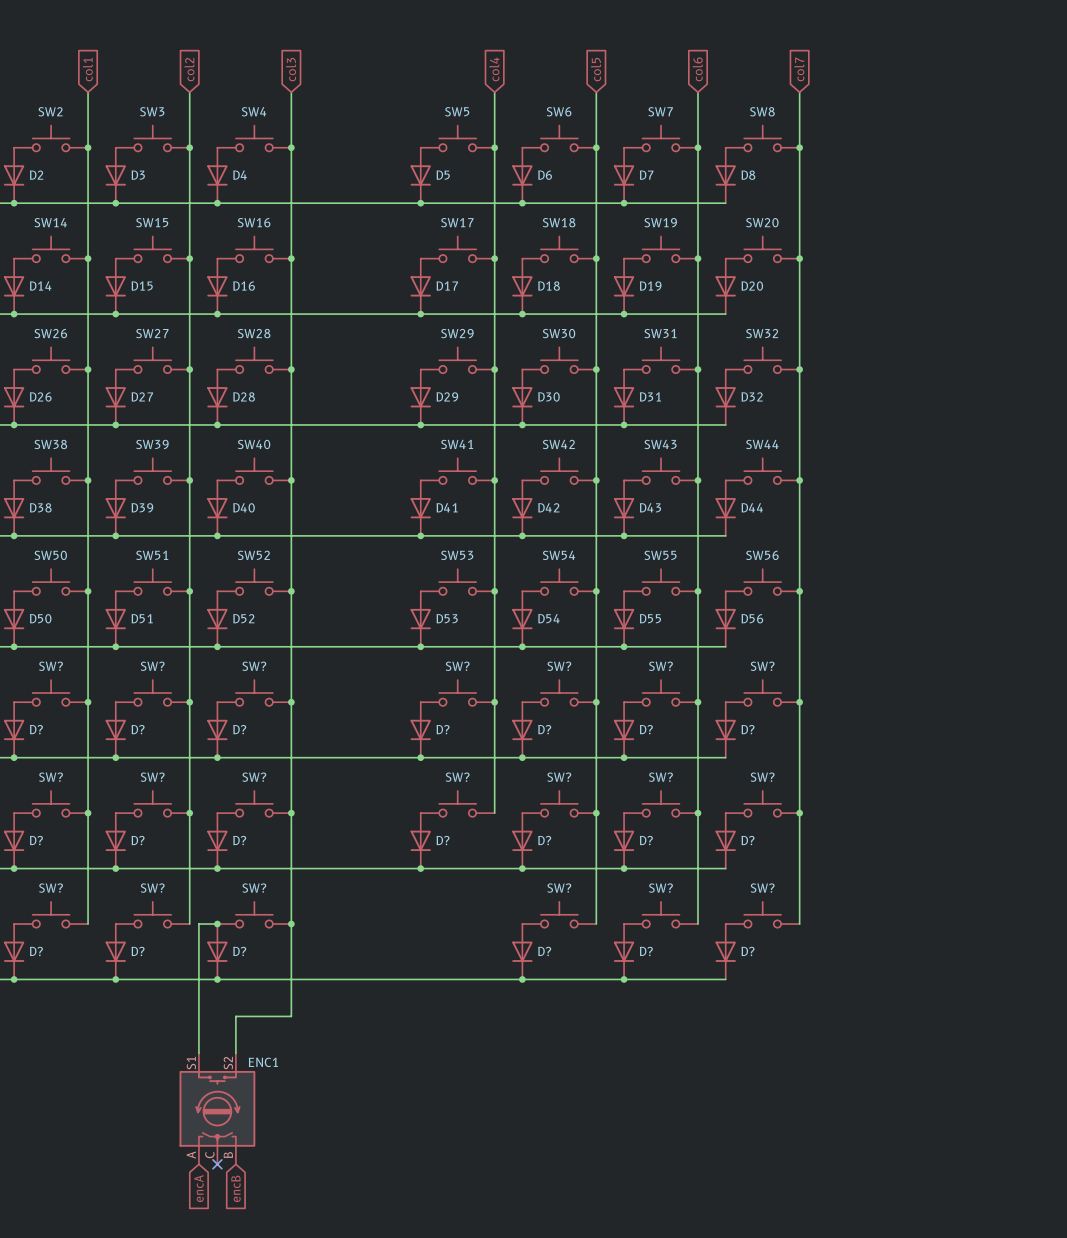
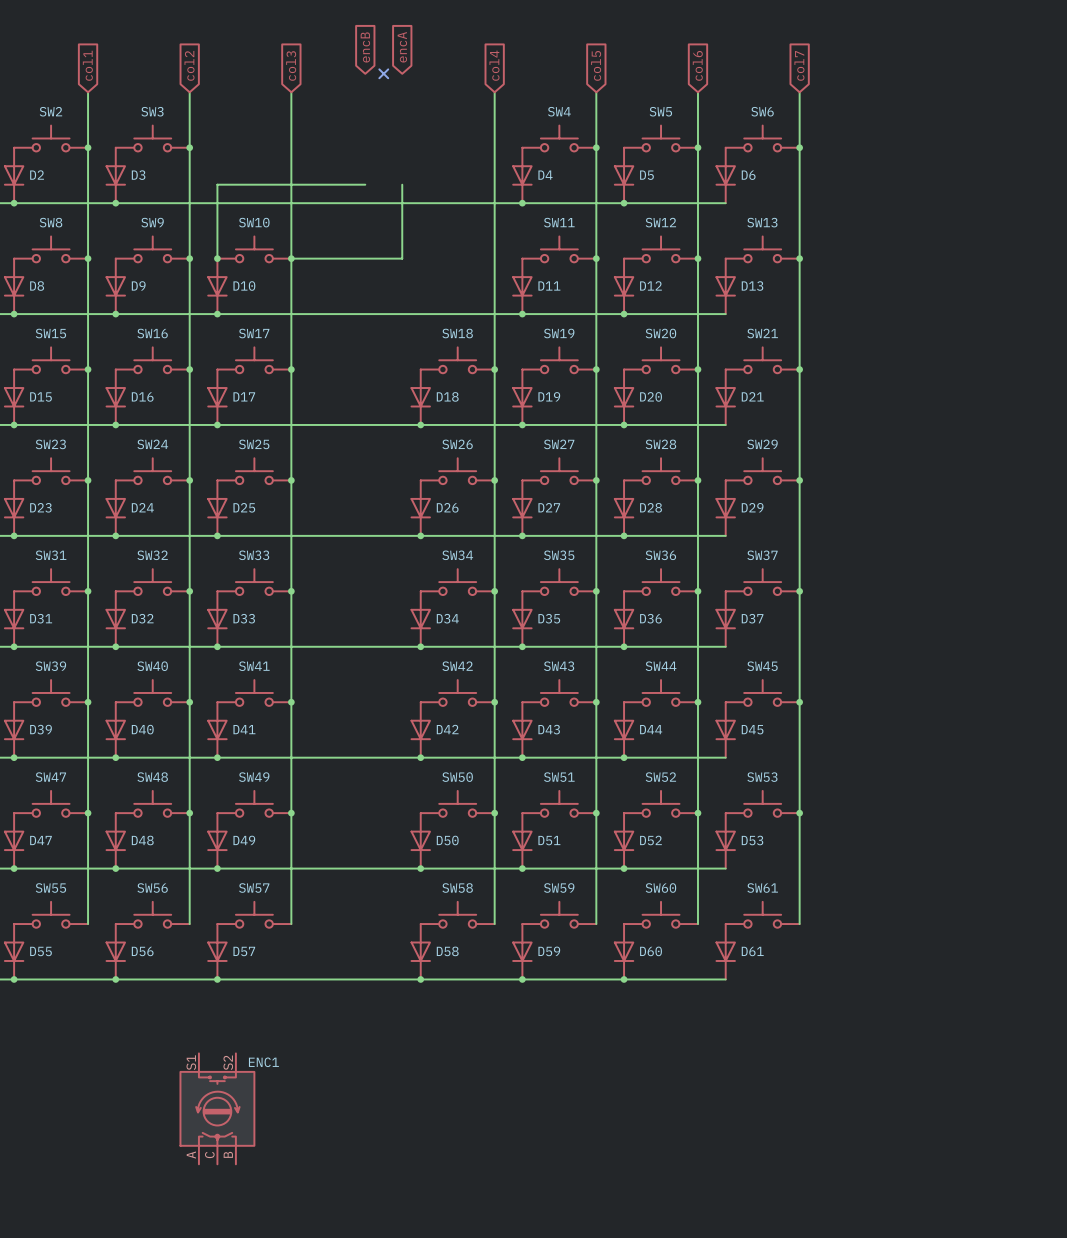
global label: none -> encB (365, 47)
global label: none -> encA (402, 47)
no-connect mark: none -> (383, 73)
SW6 name: SW6 (559, 111) -> SW4 (559, 111)
SW7 name: SW7 (660, 111) -> SW5 (660, 111)
SW8 name: SW8 (762, 111) -> SW6 (762, 111)
SW4: (254, 138) -> none
SW5: (457, 138) -> none
junction: (291, 147) -> none
junction: (494, 147) -> none
D4: (217, 175) -> none
D5: (420, 175) -> none
D6 name: D6 (545, 175) -> D4 (545, 175)
D7 name: D7 (646, 175) -> D5 (646, 175)
D8 name: D8 (748, 175) -> D6 (748, 175)
wire: none -> (365, 184) (217, 184) (217, 258)
wire: none -> (402, 184) (402, 258) (291, 258)
junction: (217, 203) -> none
junction: (420, 203) -> none
SW14 name: SW14 (50, 222) -> SW8 (51, 222)
SW15 name: SW15 (152, 222) -> SW9 (152, 222)
SW16 name: SW16 (254, 222) -> SW10 (254, 222)
SW18 name: SW18 (559, 222) -> SW11 (559, 222)
SW19 name: SW19 (660, 222) -> SW12 (660, 222)
SW20 name: SW20 (762, 222) -> SW13 (762, 222)
SW17: (457, 249) -> none
junction: none -> (217, 258)
junction: (494, 258) -> none
D14 name: D14 (40, 286) -> D8 (37, 286)
D15 name: D15 (142, 286) -> D9 (138, 285)
D16 name: D16 (244, 286) -> D10 (244, 286)
D17: (420, 286) -> none
D18 name: D18 (549, 286) -> D11 (549, 286)
D19 name: D19 (650, 286) -> D12 (650, 285)
D20 name: D20 (752, 286) -> D13 (752, 286)
junction: (420, 314) -> none
SW26 name: SW26 (50, 333) -> SW15 (50, 333)
SW27 name: SW27 (152, 333) -> SW16 (152, 333)
SW28 name: SW28 (254, 333) -> SW17 (254, 333)
SW29 name: SW29 (457, 333) -> SW18 (457, 333)
SW30 name: SW30 (559, 333) -> SW19 (559, 333)
SW31 name: SW31 (660, 333) -> SW20 (660, 333)
SW32 name: SW32 (762, 333) -> SW21 (762, 333)
D26 name: D26 (40, 396) -> D15 (41, 396)
D27 name: D27 (142, 396) -> D16 (142, 396)
D28 name: D28 (244, 396) -> D17 (244, 396)
D29 name: D29 (447, 396) -> D18 (447, 396)
D30 name: D30 (548, 396) -> D19 (549, 396)
D31 name: D31 (650, 396) -> D20 (651, 396)
D32 name: D32 (752, 396) -> D21 (752, 396)
SW38 name: SW38 (50, 444) -> SW23 (50, 444)
SW39 name: SW39 (152, 444) -> SW24 (152, 444)
SW40 name: SW40 (254, 444) -> SW25 (254, 444)
SW41 name: SW41 (457, 444) -> SW26 (457, 444)
SW42 name: SW42 (558, 444) -> SW27 (559, 444)
SW43 name: SW43 (660, 444) -> SW28 (660, 444)
SW44 name: SW44 (762, 444) -> SW29 (762, 444)
D38 name: D38 (40, 507) -> D23 (40, 507)
D39 name: D39 (142, 507) -> D24 (142, 507)
D40 name: D40 (244, 507) -> D25 (244, 507)
D41 name: D41 (447, 507) -> D26 (447, 507)
D42 name: D42 (548, 507) -> D27 (549, 507)
D43 name: D43 (650, 507) -> D28 (651, 507)
D44 name: D44 (752, 507) -> D29 (752, 507)
SW50 name: SW50 (50, 555) -> SW31 (51, 555)
SW51 name: SW51 (152, 555) -> SW32 (152, 555)
SW52 name: SW52 (253, 555) -> SW33 (254, 555)
SW53 name: SW53 (457, 555) -> SW34 (457, 555)
SW54 name: SW54 (559, 555) -> SW35 (559, 555)
SW55 name: SW55 (660, 555) -> SW36 (660, 555)
SW56 name: SW56 (762, 555) -> SW37 (762, 555)
D50 name: D50 (40, 618) -> D31 (41, 618)
D51 name: D51 (142, 618) -> D32 (142, 618)
D52 name: D52 (243, 618) -> D33 (244, 618)
D53 name: D53 (447, 618) -> D34 (447, 618)
D54 name: D54 (548, 618) -> D35 (549, 618)
D55 name: D55 (650, 618) -> D36 (650, 618)
D56 name: D56 (752, 618) -> D37 (752, 618)
SW? name: SW? (51, 666) -> SW39 (50, 666)
SW? name: SW? (152, 666) -> SW40 (152, 666)
SW? name: SW? (254, 666) -> SW41 (254, 666)
SW? name: SW? (457, 666) -> SW42 (457, 666)
SW? name: SW? (559, 666) -> SW43 (559, 666)
SW? name: SW? (660, 666) -> SW44 (661, 666)
SW? name: SW? (762, 666) -> SW45 (762, 666)
D? name: D? (36, 729) -> D39 (41, 729)
D? name: D? (138, 729) -> D40 (142, 729)
D? name: D? (239, 729) -> D41 (244, 729)
D? name: D? (443, 729) -> D42 (447, 729)
D? name: D? (544, 729) -> D43 (549, 729)
D? name: D? (646, 729) -> D44 (651, 729)
D? name: D? (748, 729) -> D45 (752, 729)
SW? name: SW? (51, 777) -> SW47 (50, 777)
SW? name: SW? (152, 777) -> SW48 (152, 777)
SW? name: SW? (254, 777) -> SW49 (254, 777)
SW? name: SW? (457, 777) -> SW50 (457, 777)
SW? name: SW? (559, 777) -> SW51 (559, 777)
SW? name: SW? (660, 777) -> SW52 (660, 777)
SW? name: SW? (762, 777) -> SW53 (762, 777)
wire: none -> (494, 813) (494, 924)
junction: none -> (494, 813)
D? name: D? (36, 840) -> D47 (40, 840)
D? name: D? (138, 840) -> D48 (142, 840)
D? name: D? (239, 840) -> D49 (244, 840)
D? name: D? (443, 840) -> D50 (447, 840)
D? name: D? (544, 840) -> D51 (549, 840)
D? name: D? (646, 840) -> D52 (650, 840)
D? name: D? (748, 840) -> D53 (752, 840)
SW? name: SW? (51, 888) -> SW55 (50, 888)
SW? name: SW? (152, 888) -> SW56 (152, 888)
SW? name: SW? (254, 888) -> SW57 (254, 888)
SW? name: SW? (559, 888) -> SW59 (559, 888)
SW? name: SW? (660, 888) -> SW60 (660, 888)
SW? name: SW? (762, 888) -> SW61 (762, 888)
SW58: none -> (457, 914)
wire: (217, 924) (198, 924) (198, 1053) -> none
junction: (217, 924) -> none
wire: (291, 924) (291, 1016) (235, 1016) (235, 1053) -> none
junction: (291, 924) -> none
D? name: D? (36, 951) -> D55 (41, 951)
D? name: D? (138, 951) -> D56 (142, 951)
D? name: D? (239, 951) -> D57 (244, 951)
D58: none -> (420, 951)
D? name: D? (544, 951) -> D59 (549, 951)
D? name: D? (646, 951) -> D60 (651, 951)
D? name: D? (748, 951) -> D61 (752, 951)
junction: none -> (420, 979)
no-connect mark: (217, 1164) -> none
global label: encA (198, 1188) -> none
global label: encB (235, 1188) -> none

